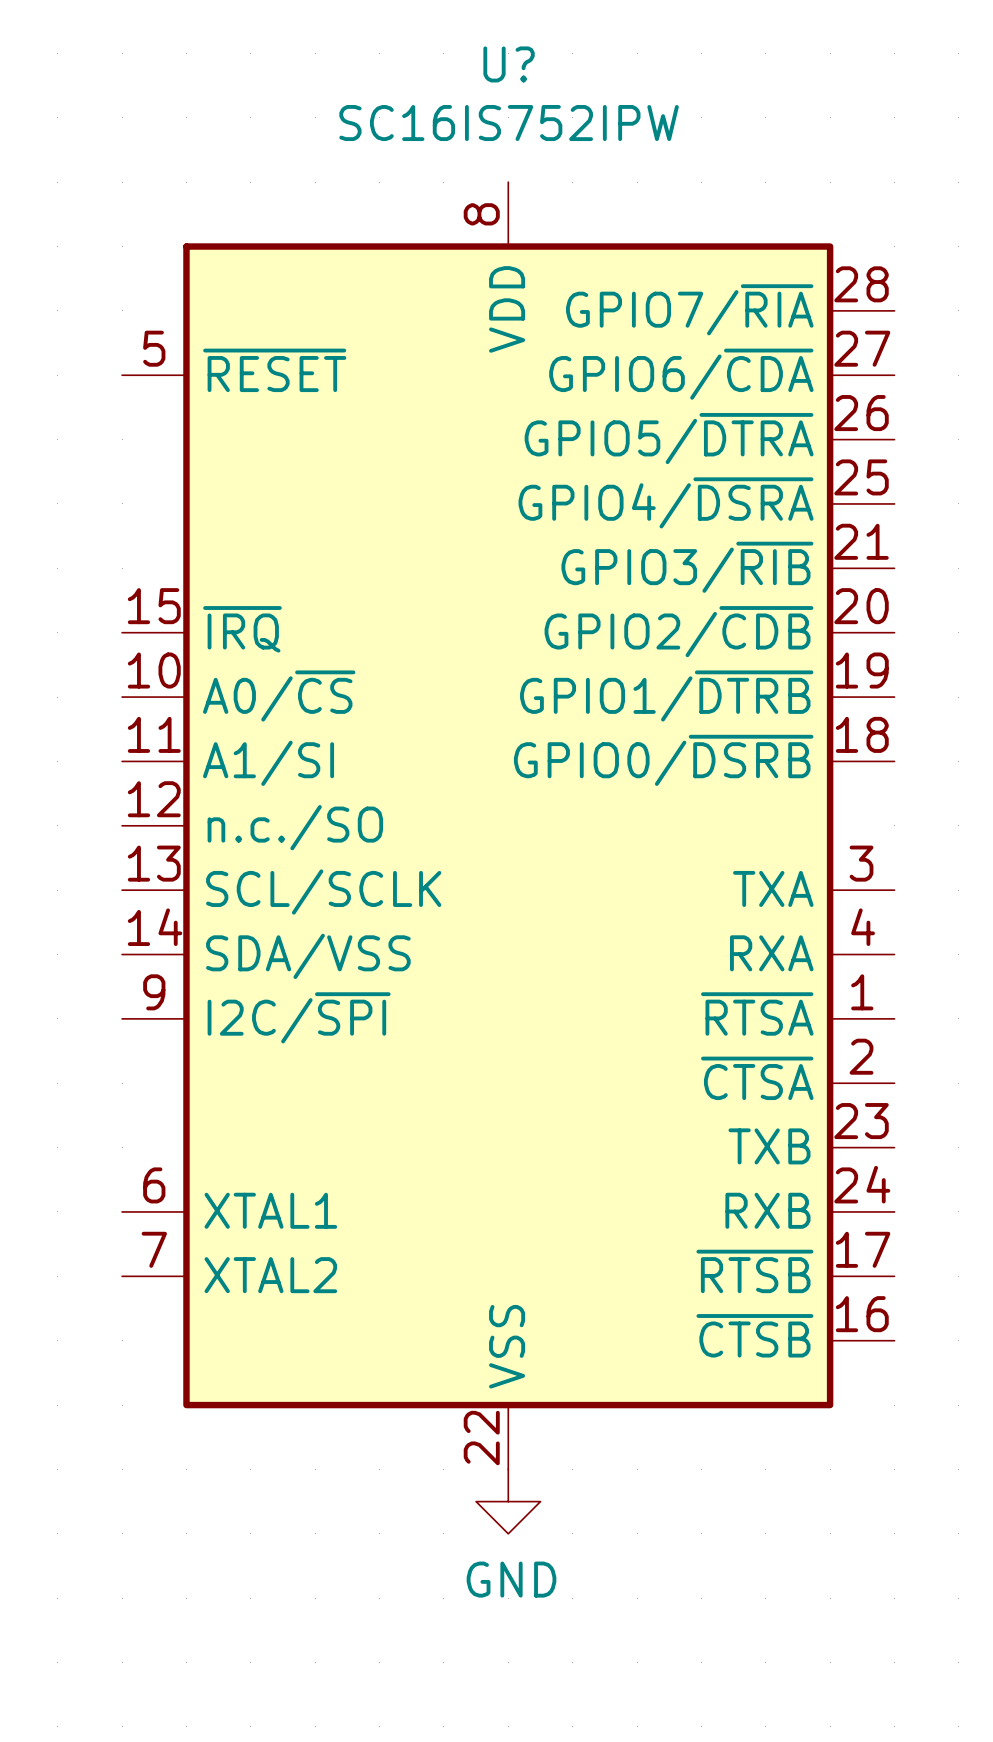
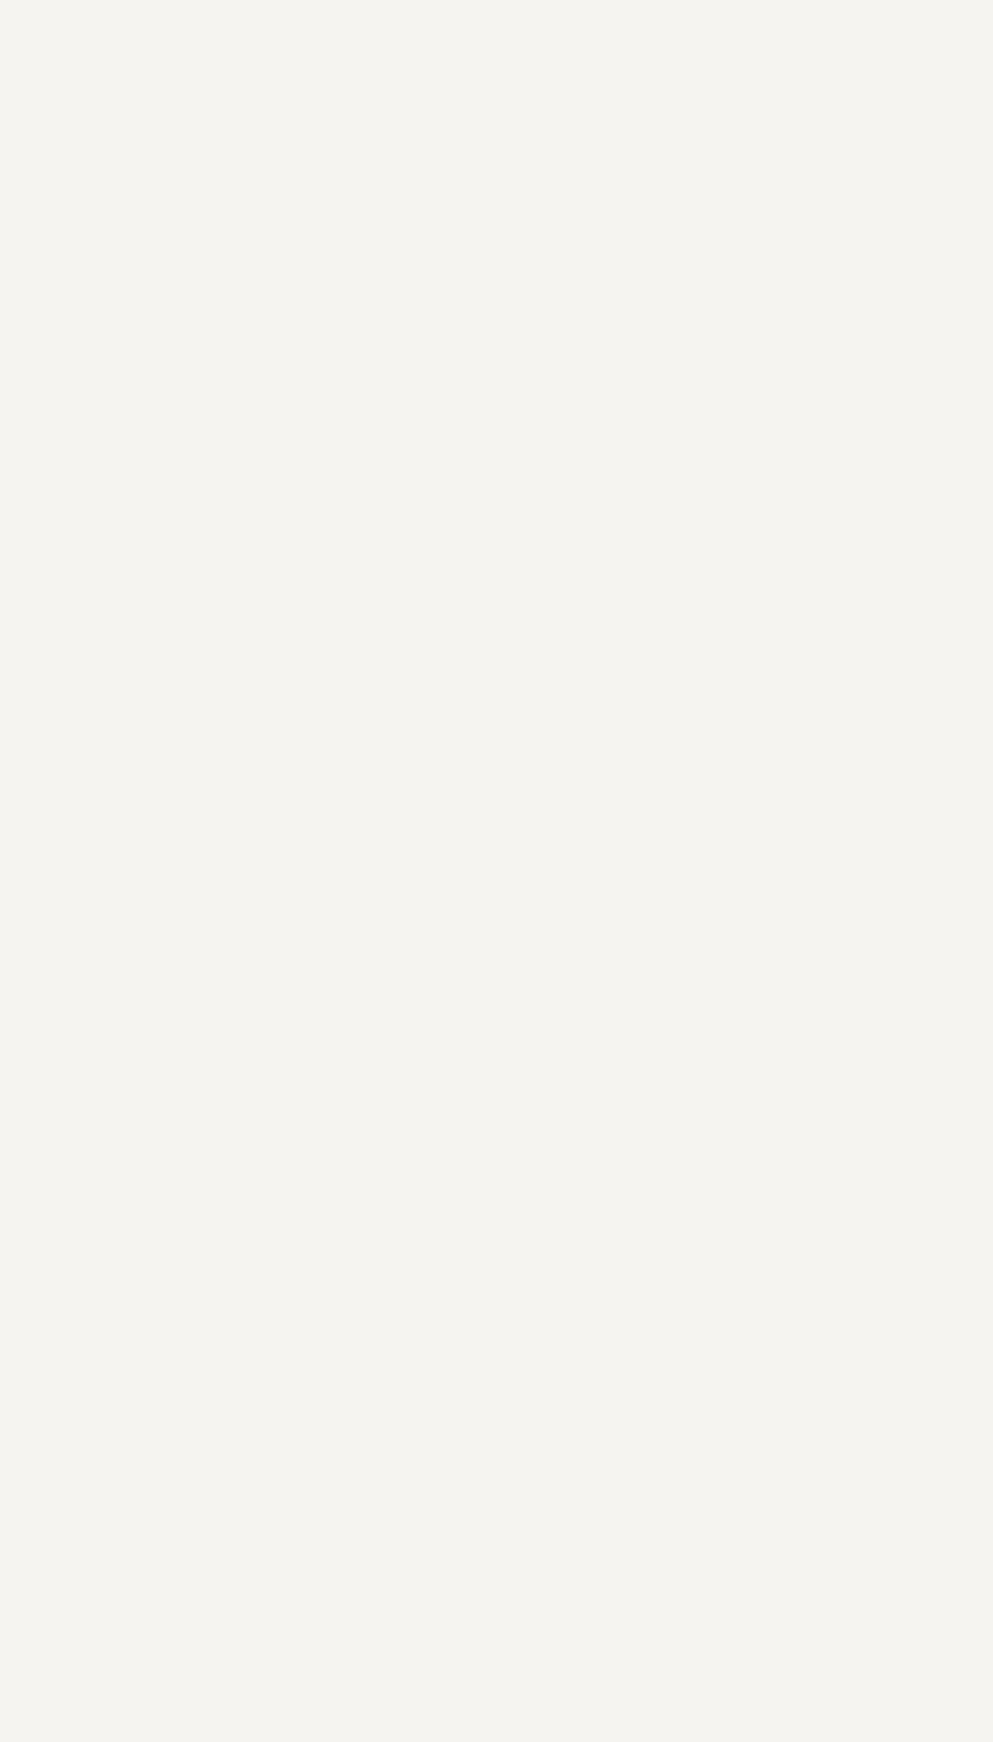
U?: SC16IS752IPW (508, 825) -> none
power symbol: GND (508, 1501) -> none

